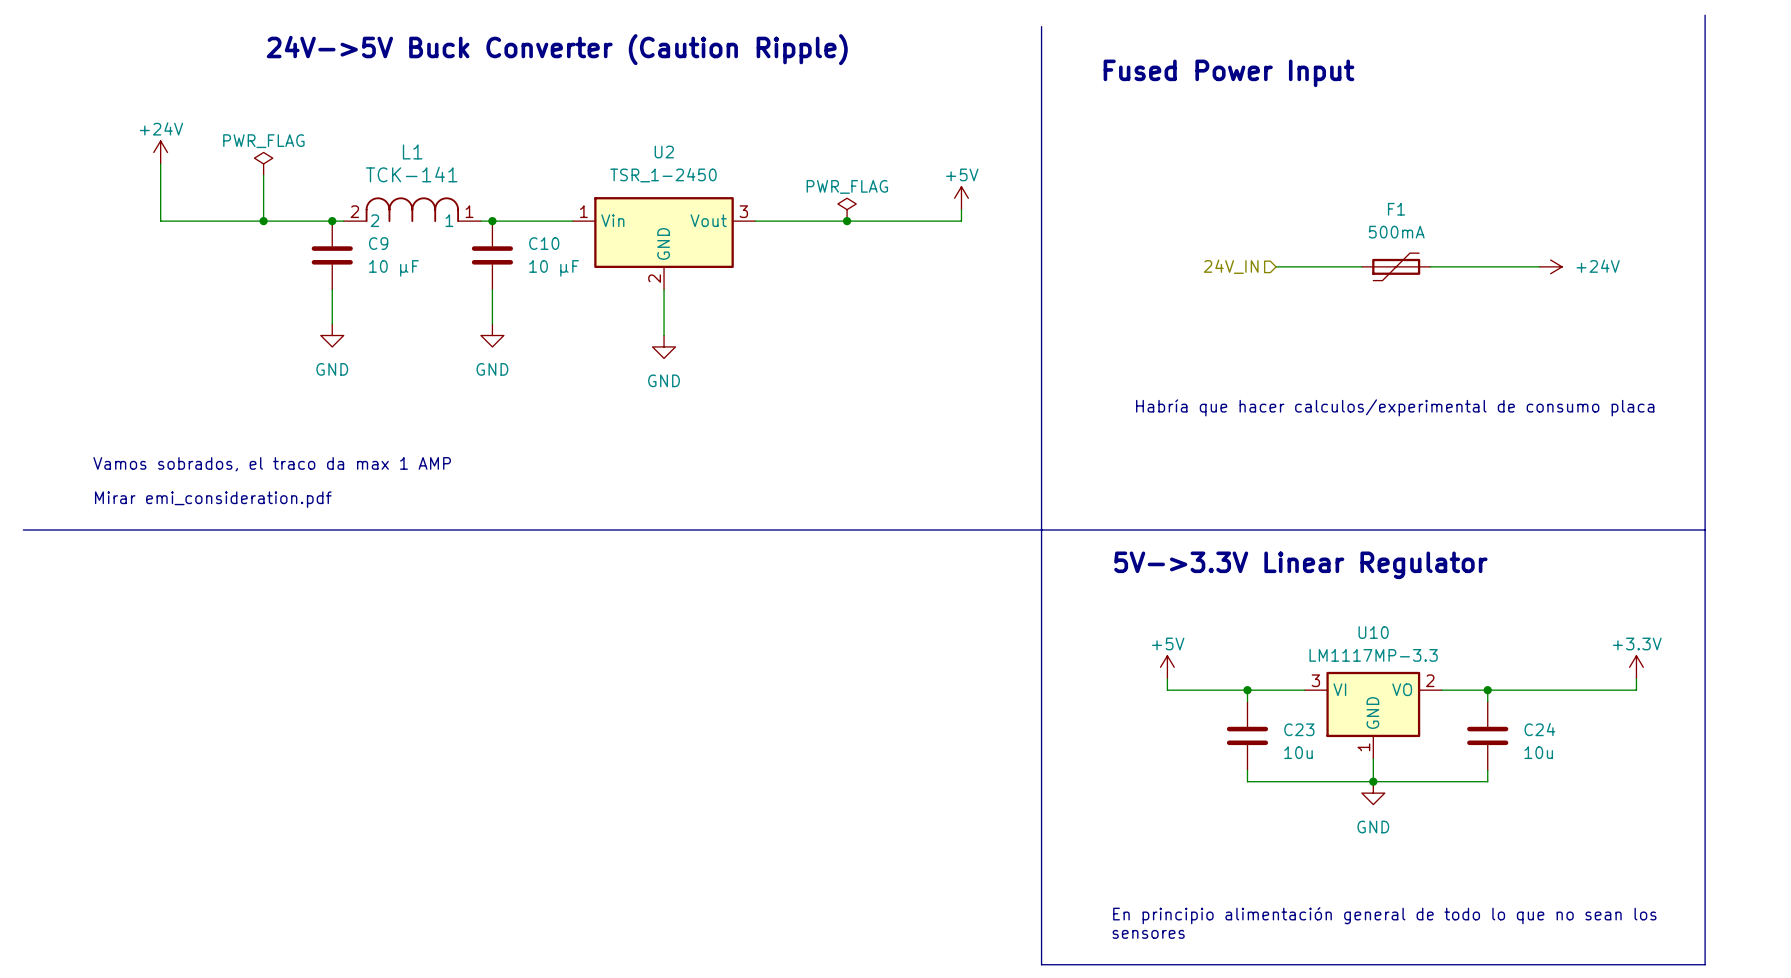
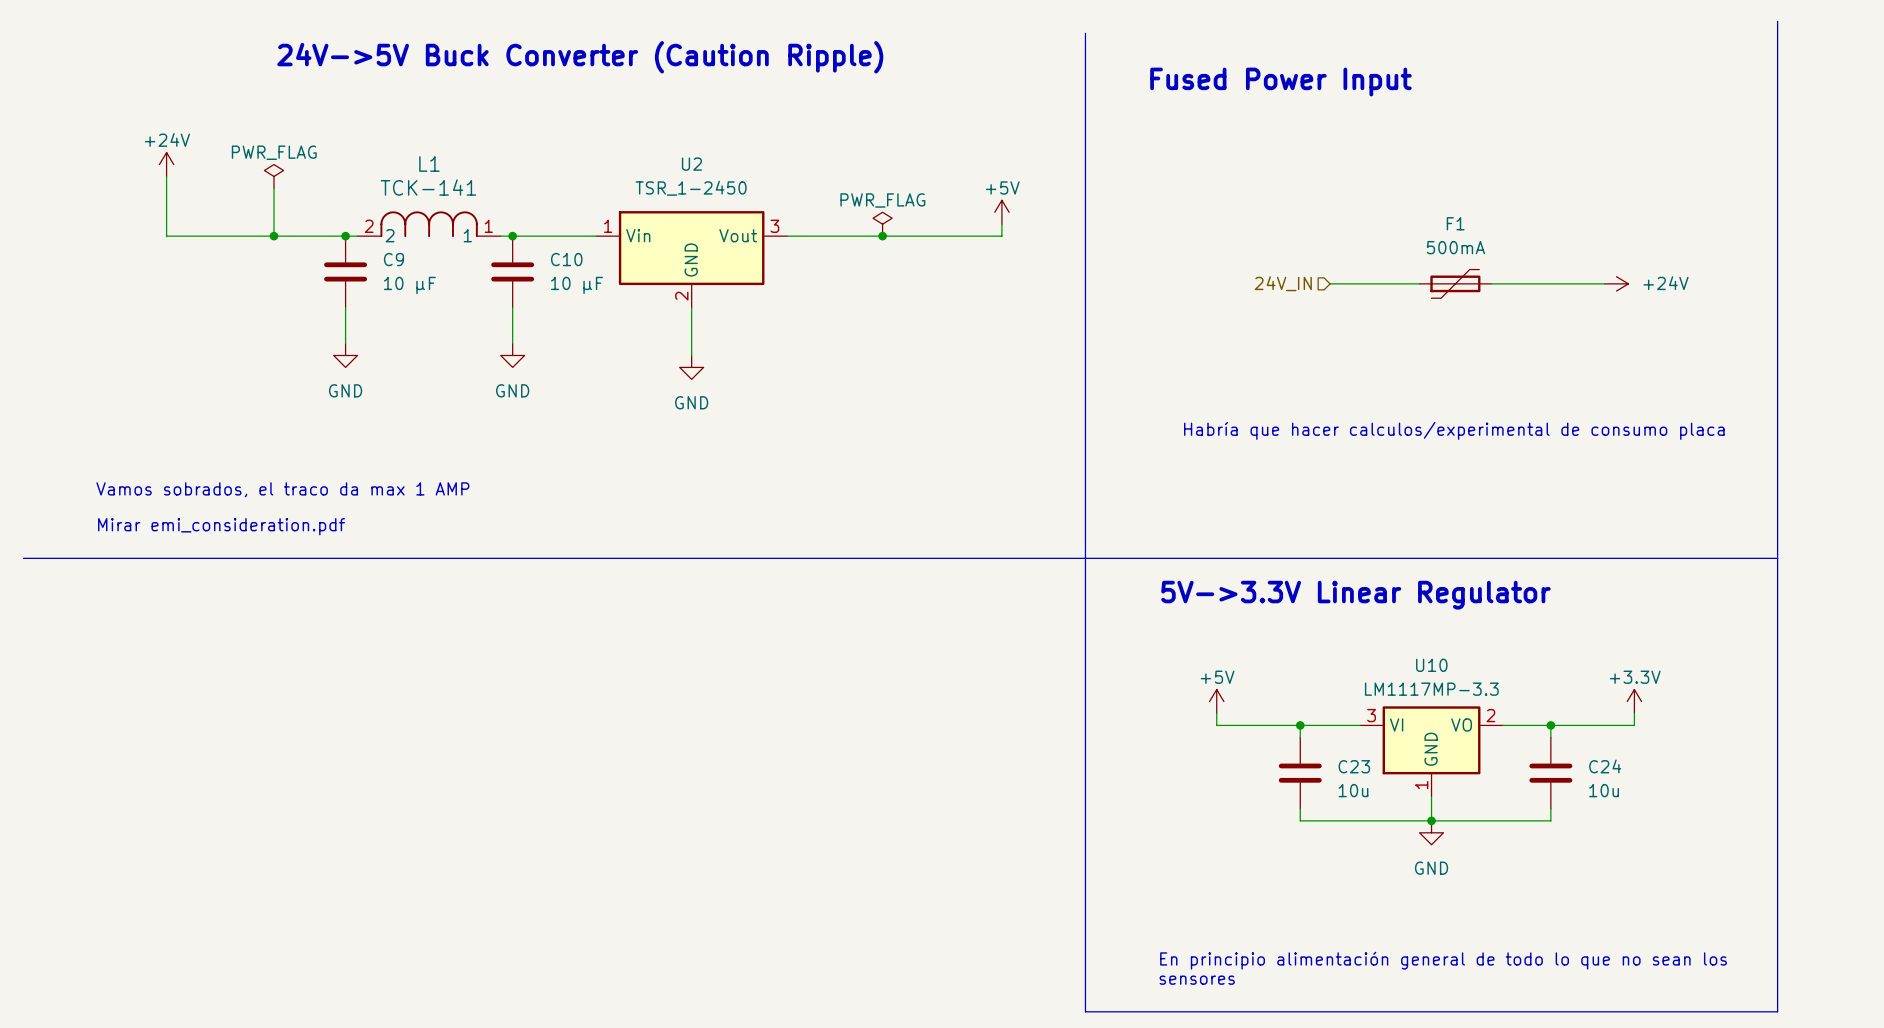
power symbol position: +3.3V (1636, 667) -> +3.3V (1634, 701)
wire: (1636, 678) (1636, 690) (1567, 690) -> (1634, 713) (1634, 725)

